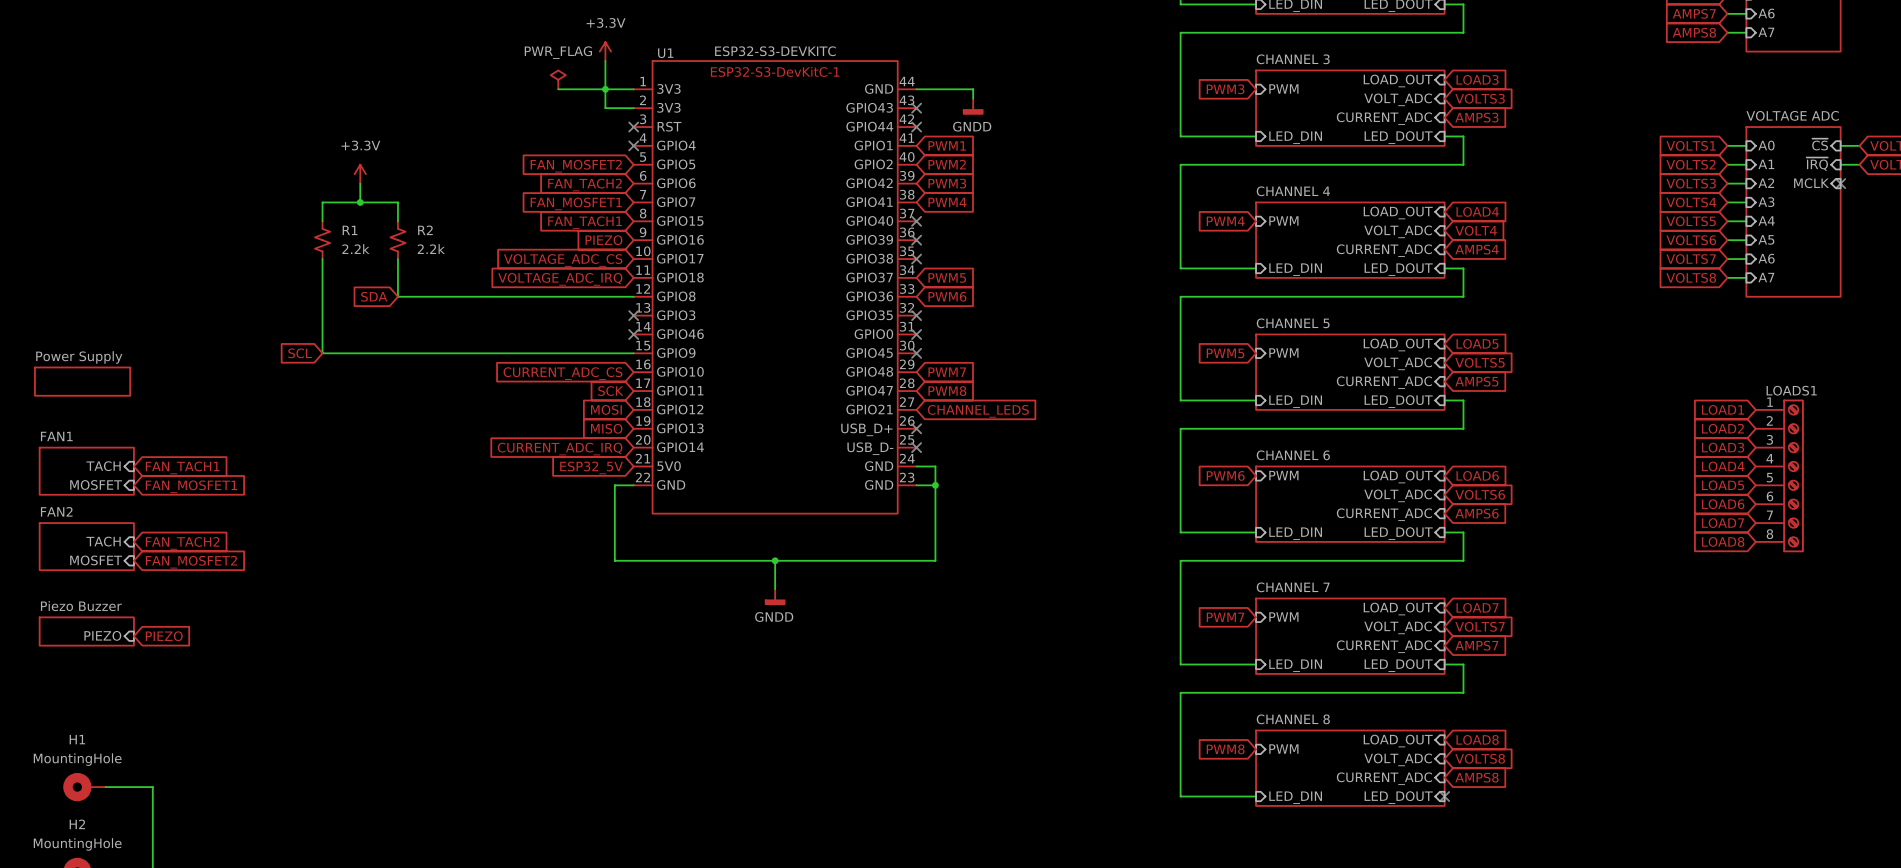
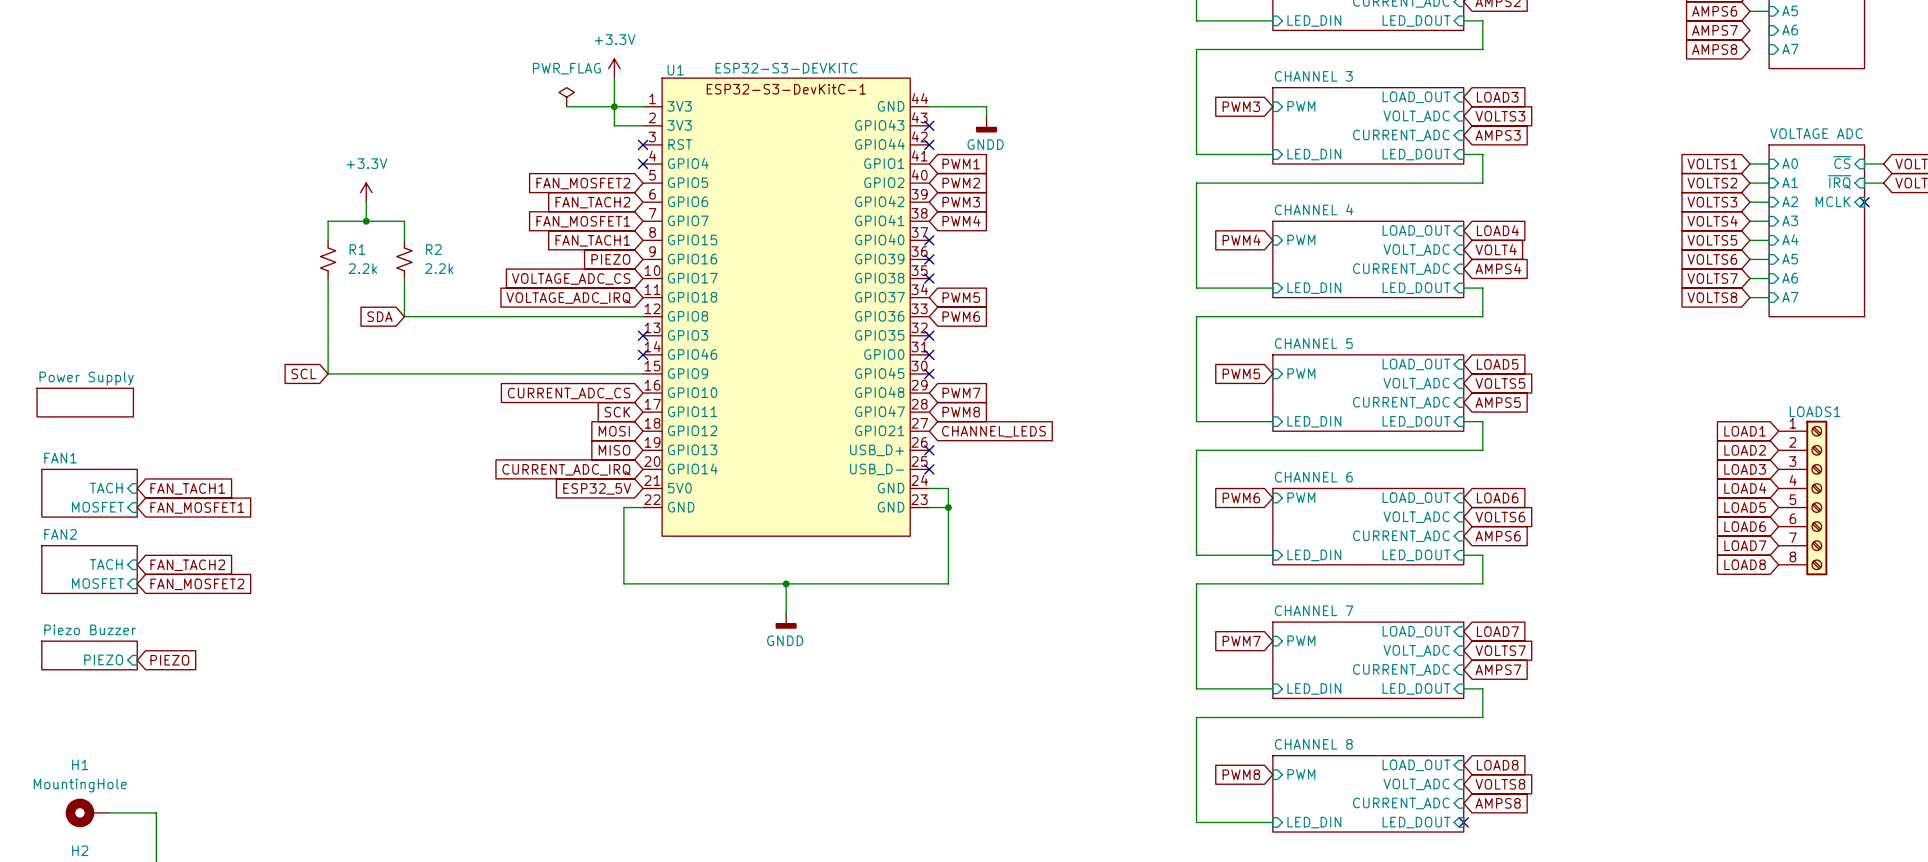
wire: (1727, 13) (1746, 13) -> none
wire: (1727, 32) (1746, 32) -> none

